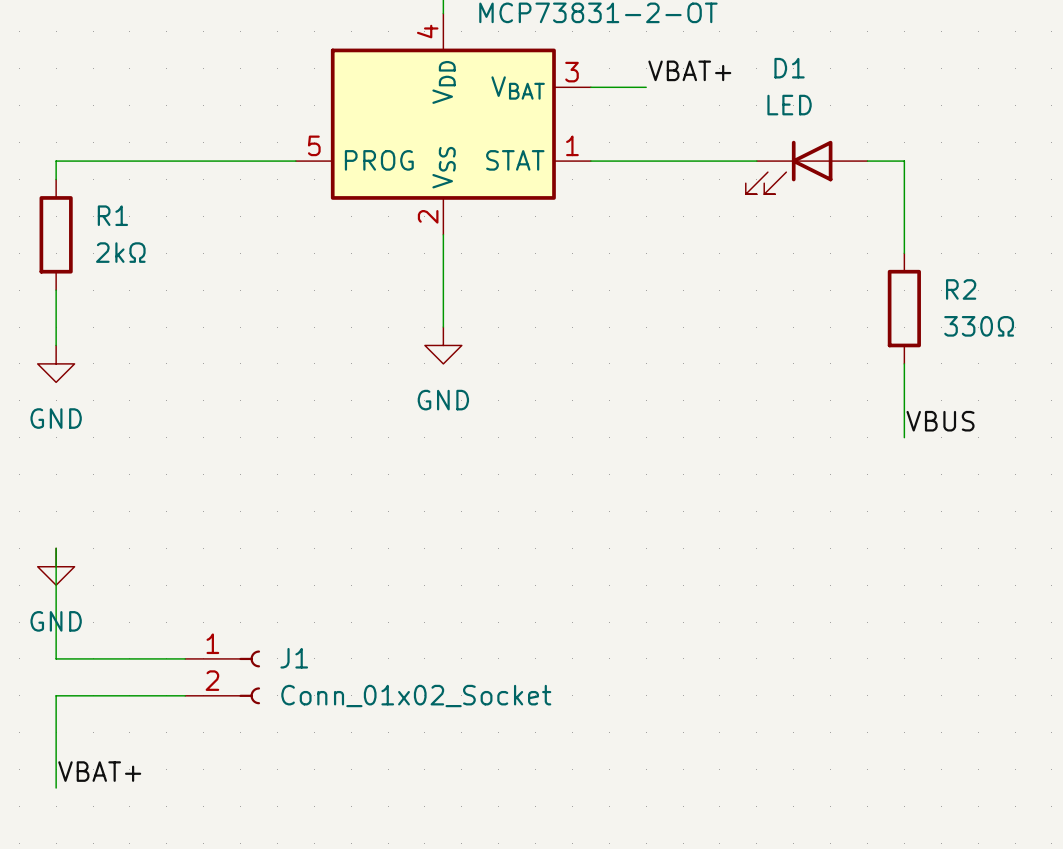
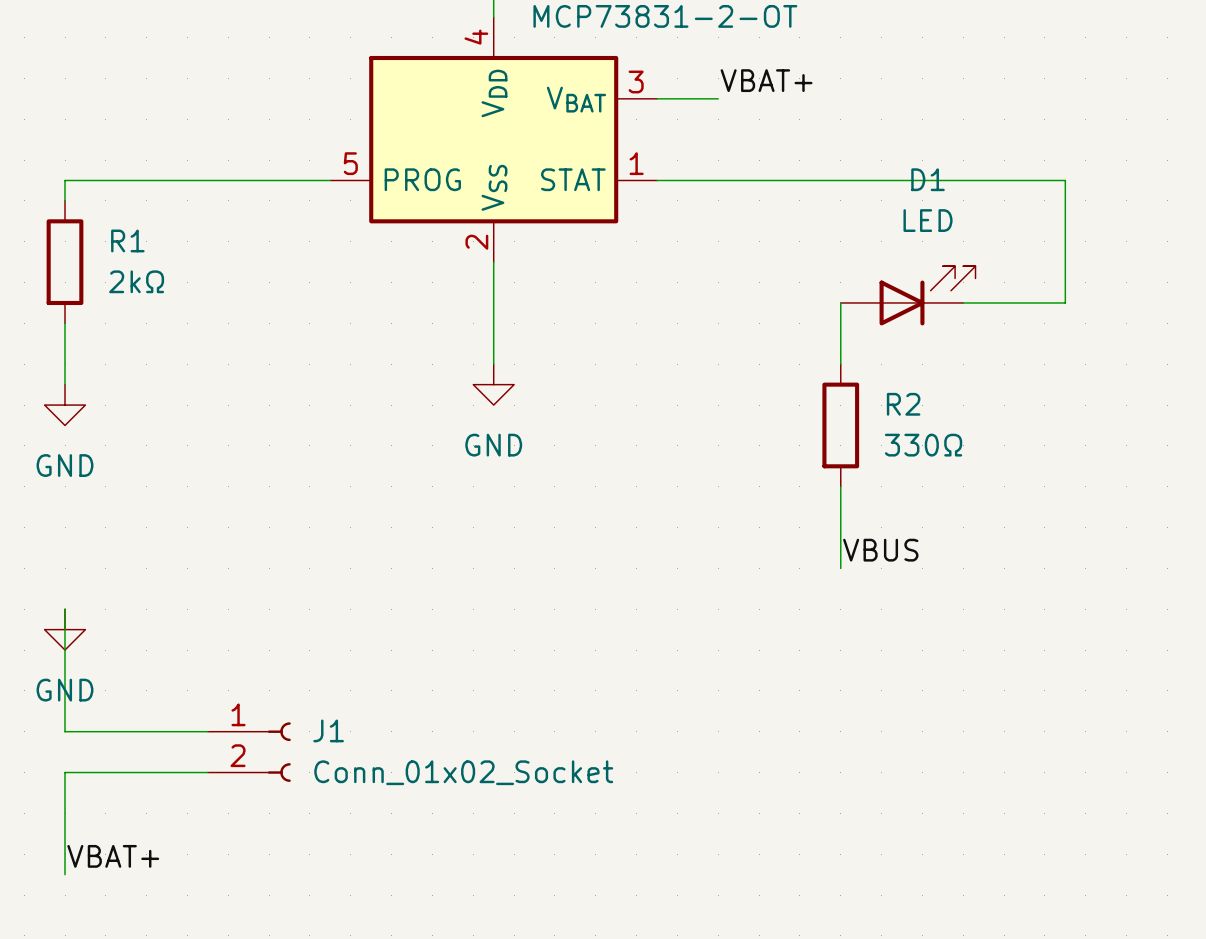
D1 name position: D1 (789, 68) -> D1 (928, 179)
D1 value position: LED (789, 105) -> LED (928, 220)
wire: (904, 161) (904, 253) -> (1004, 180) (1065, 180) (1065, 302) (963, 302)
D1 rotation: 0° (789, 167) -> 180° (927, 295)
D1 position: (806, 167) -> (908, 295)
wire: none -> (840, 302) (840, 364)
R2 position: (904, 308) -> (840, 425)
wire: (904, 363) (904, 437) -> (840, 486) (840, 568)
label position: VBUS (940, 421) -> VBUS (880, 550)

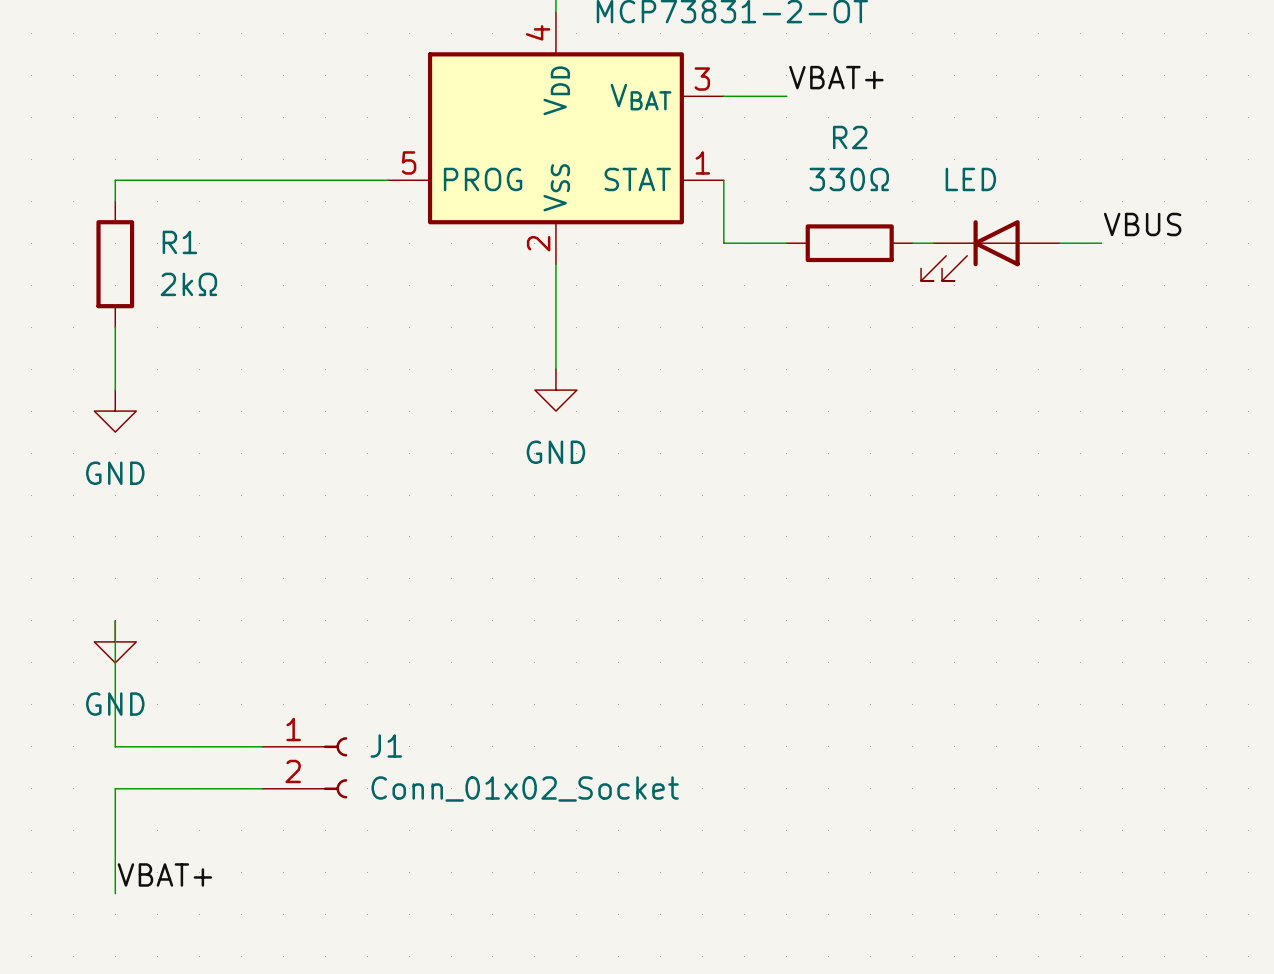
wire: (657, 180) (1065, 180) (1065, 302) (963, 302) -> (723, 180) (723, 243) (786, 243)
wire: none -> (912, 243) (933, 243)
wire: none -> (1059, 243) (1101, 243)
part: none -> LED (990, 250)
D1: LED (908, 295) -> none
wire: (840, 302) (840, 364) -> none
R2 name position: R2 (903, 404) -> R2 (850, 137)
R2 rotation: 0° (840, 425) -> 90° clockwise (849, 243)
R2 position: (840, 425) -> (849, 243)
R2 value position: 330Ω (923, 445) -> 330Ω (849, 179)
wire: (840, 486) (840, 568) -> none
label position: VBUS (880, 550) -> VBUS (1142, 224)

